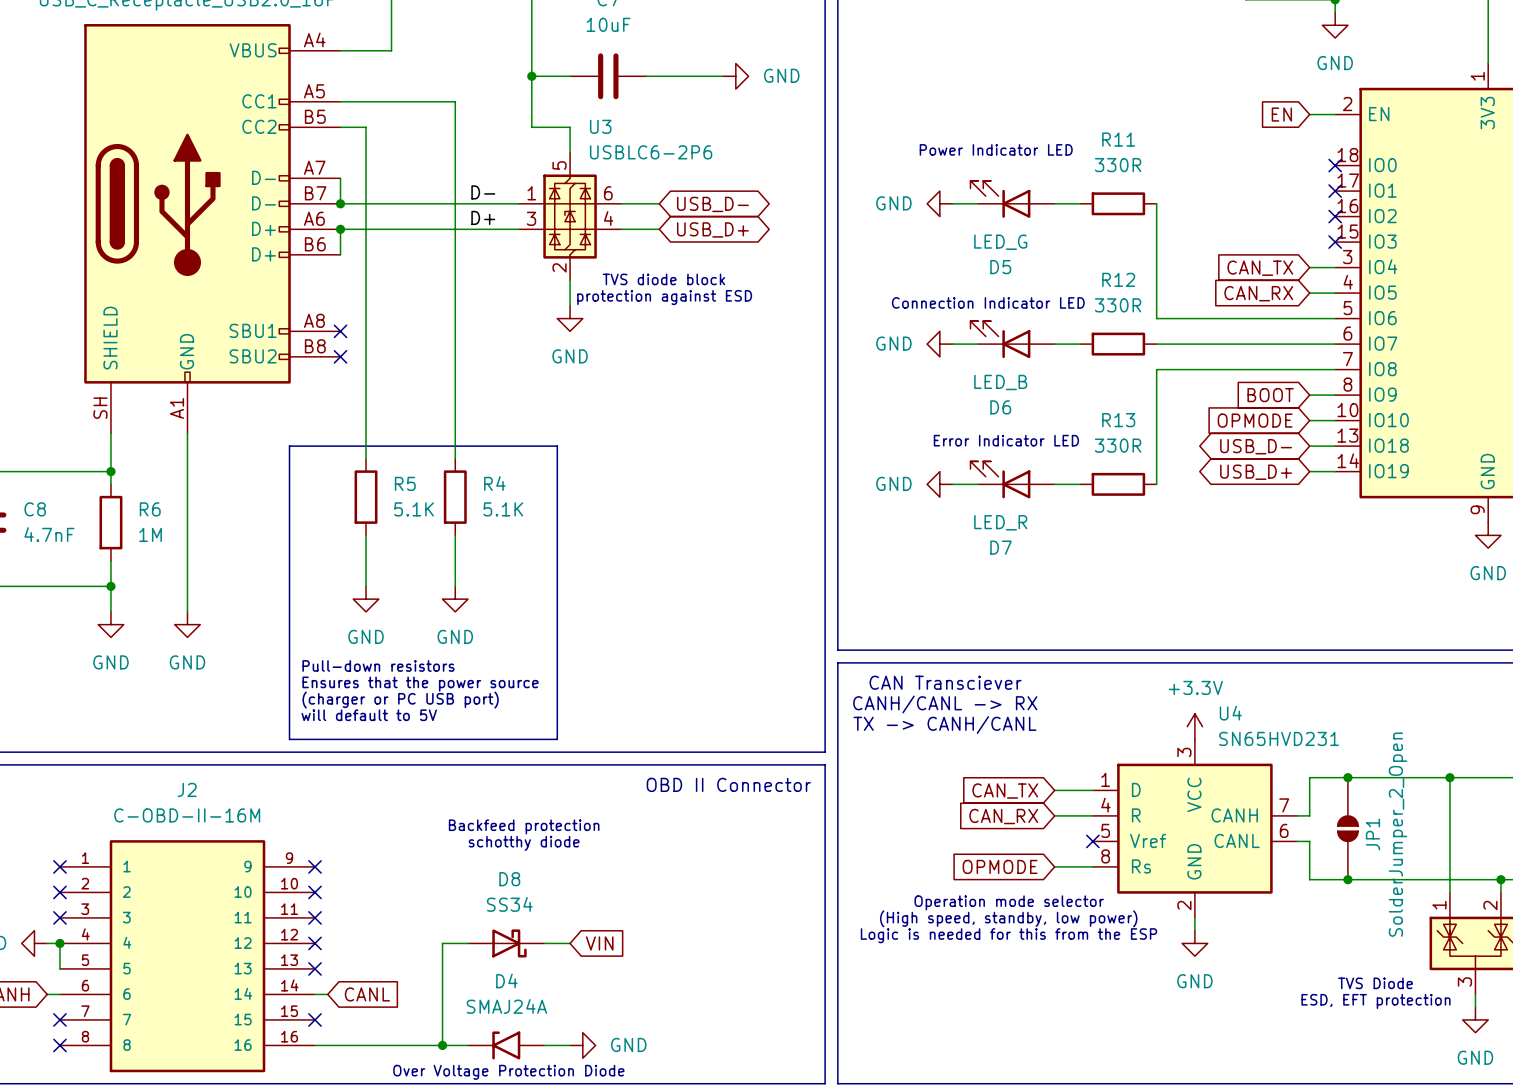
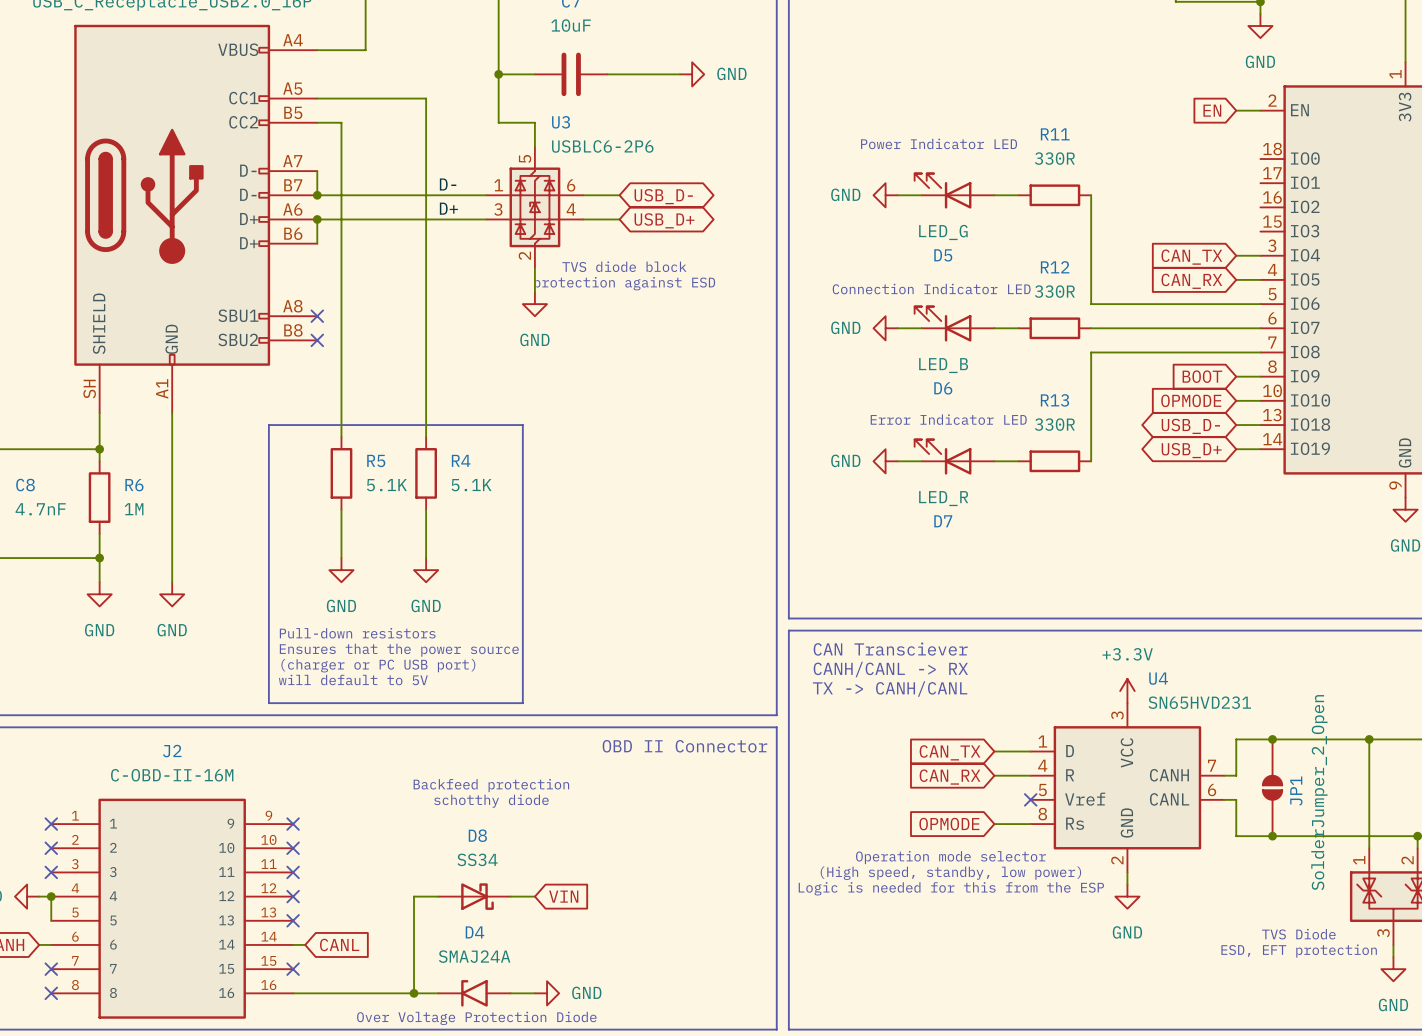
no-connect mark: (1335, 165) -> none
no-connect mark: (1335, 191) -> none
no-connect mark: (1335, 216) -> none
no-connect mark: (1335, 242) -> none

